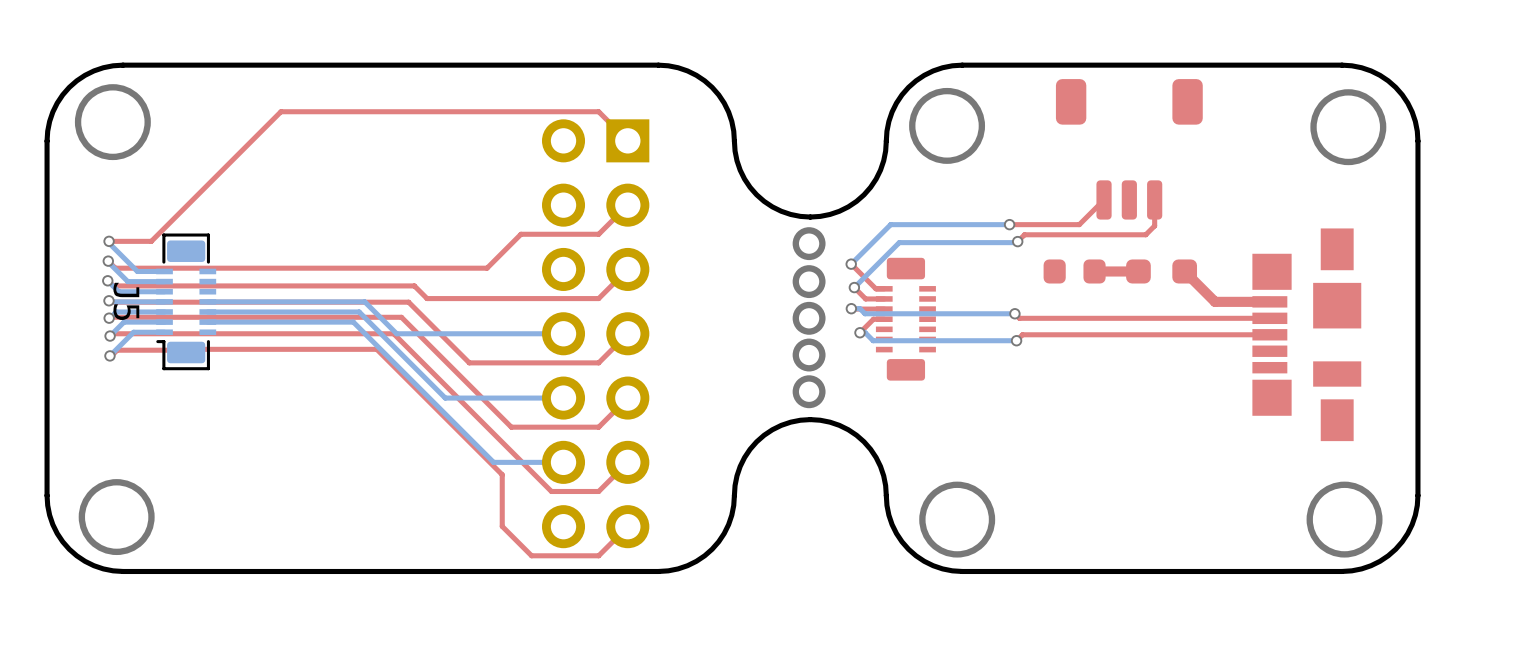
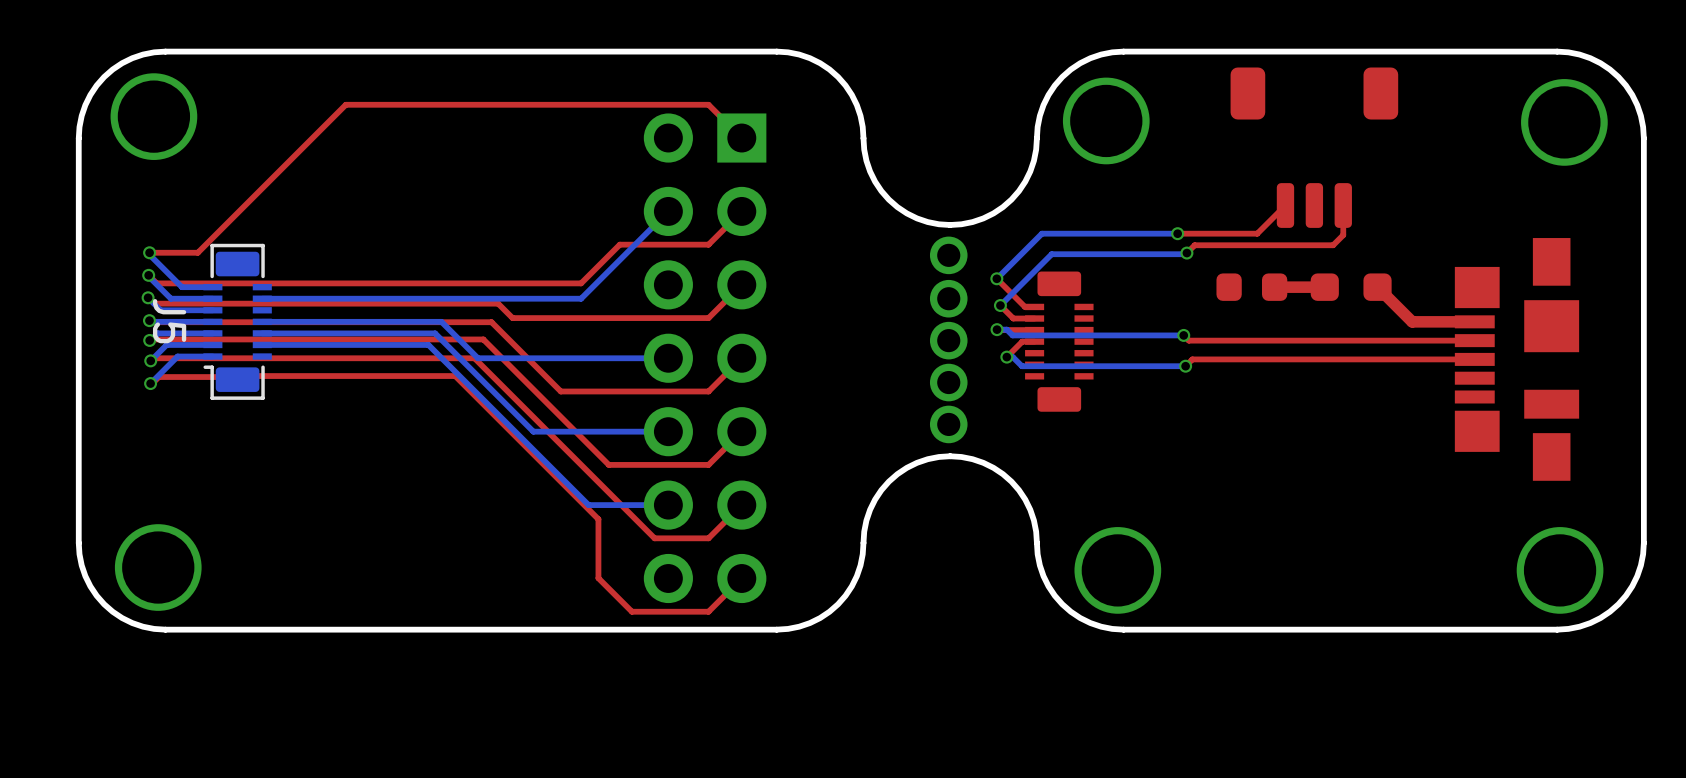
bottom track: none -> (668, 211) (581, 298) (262, 298)

